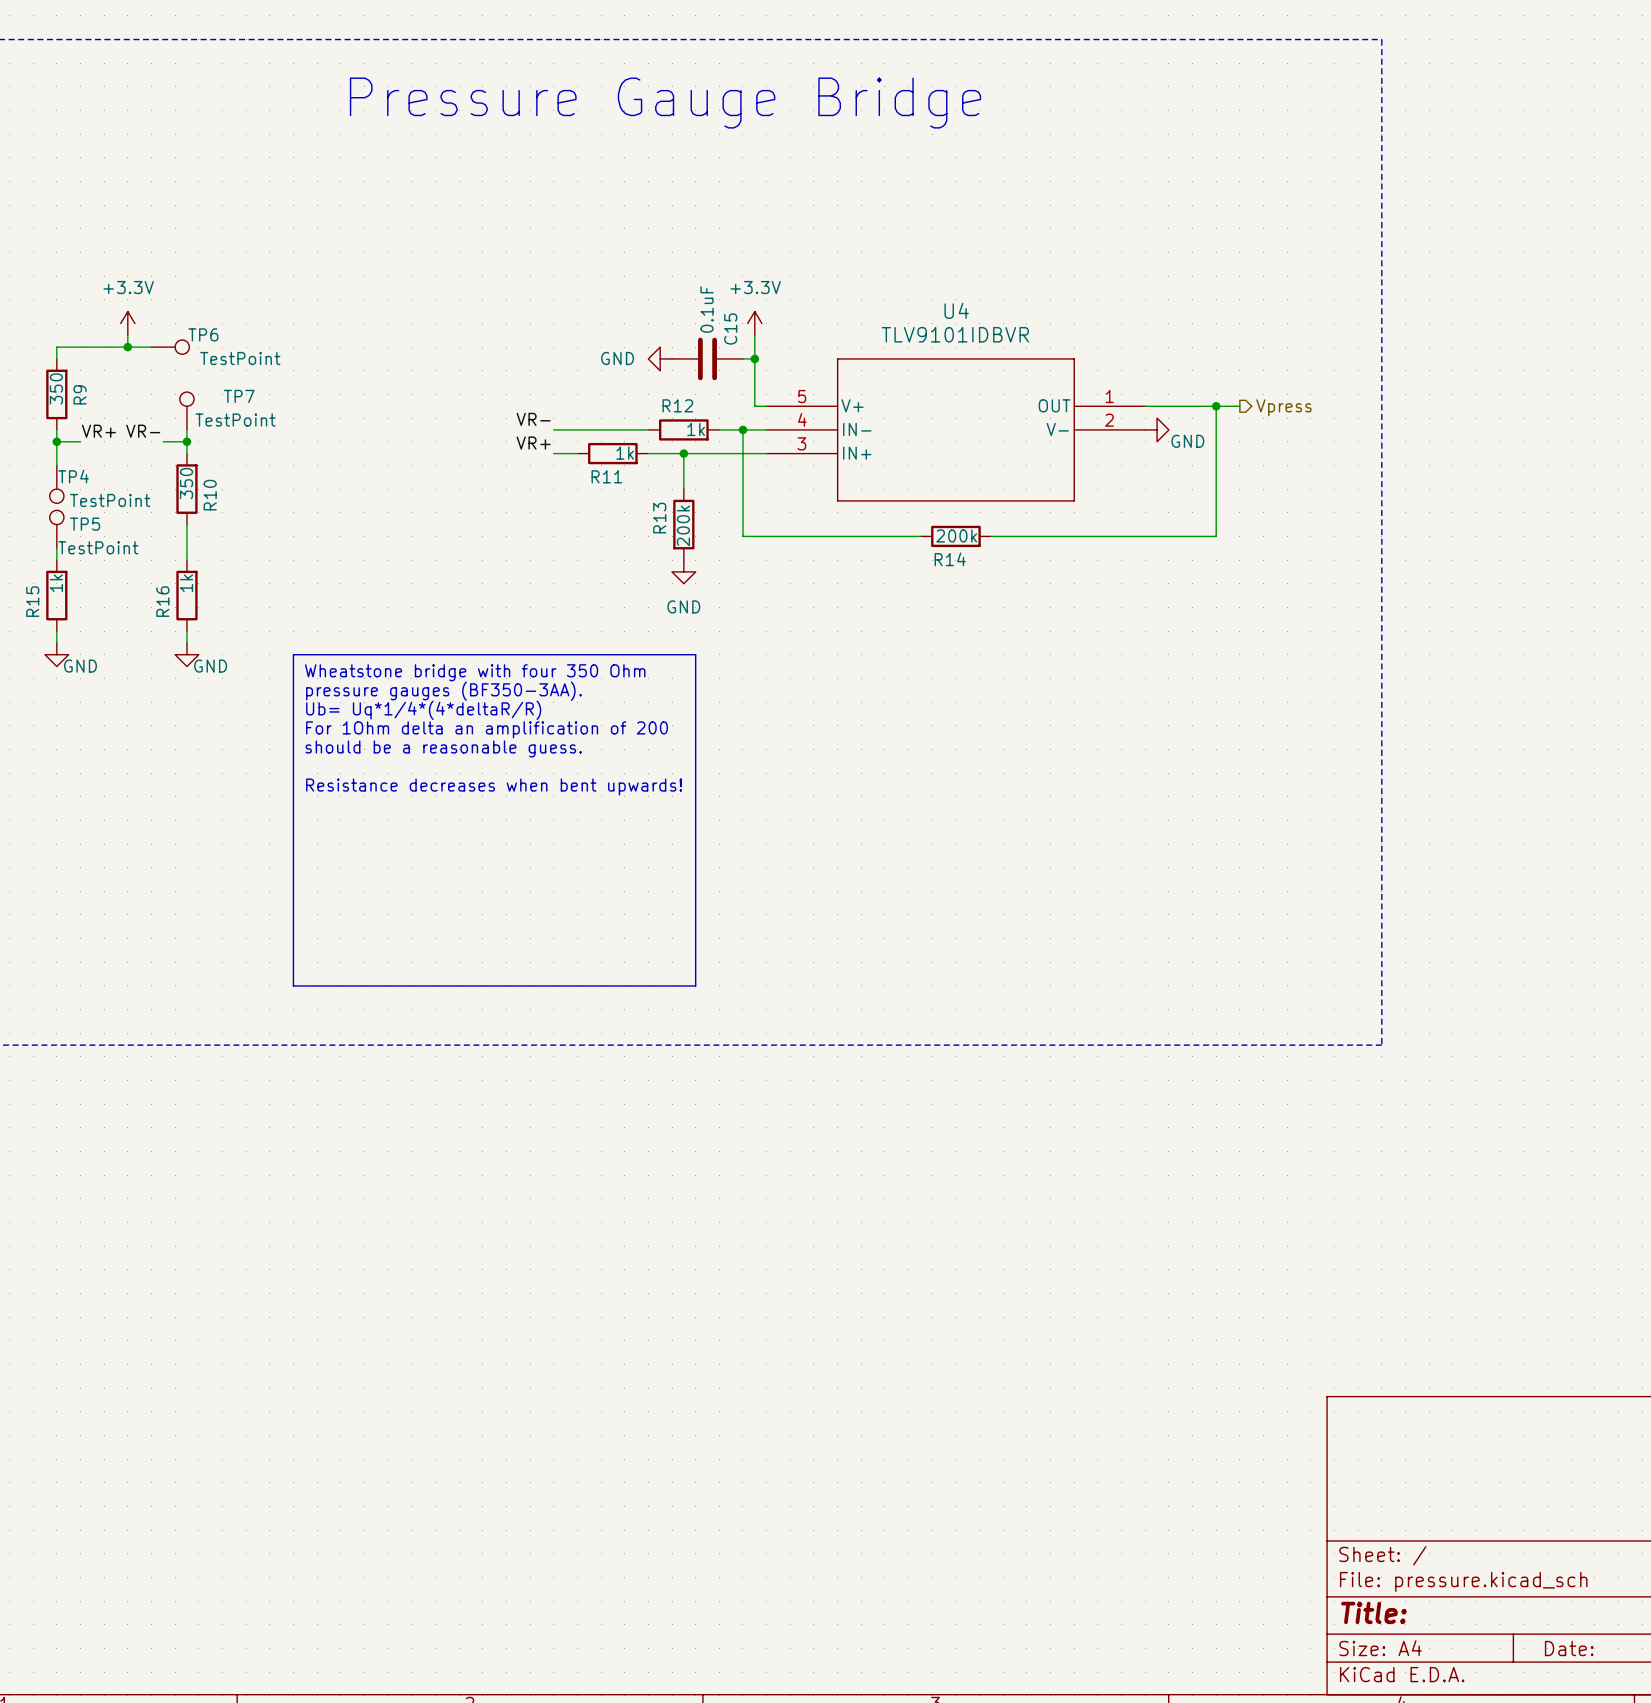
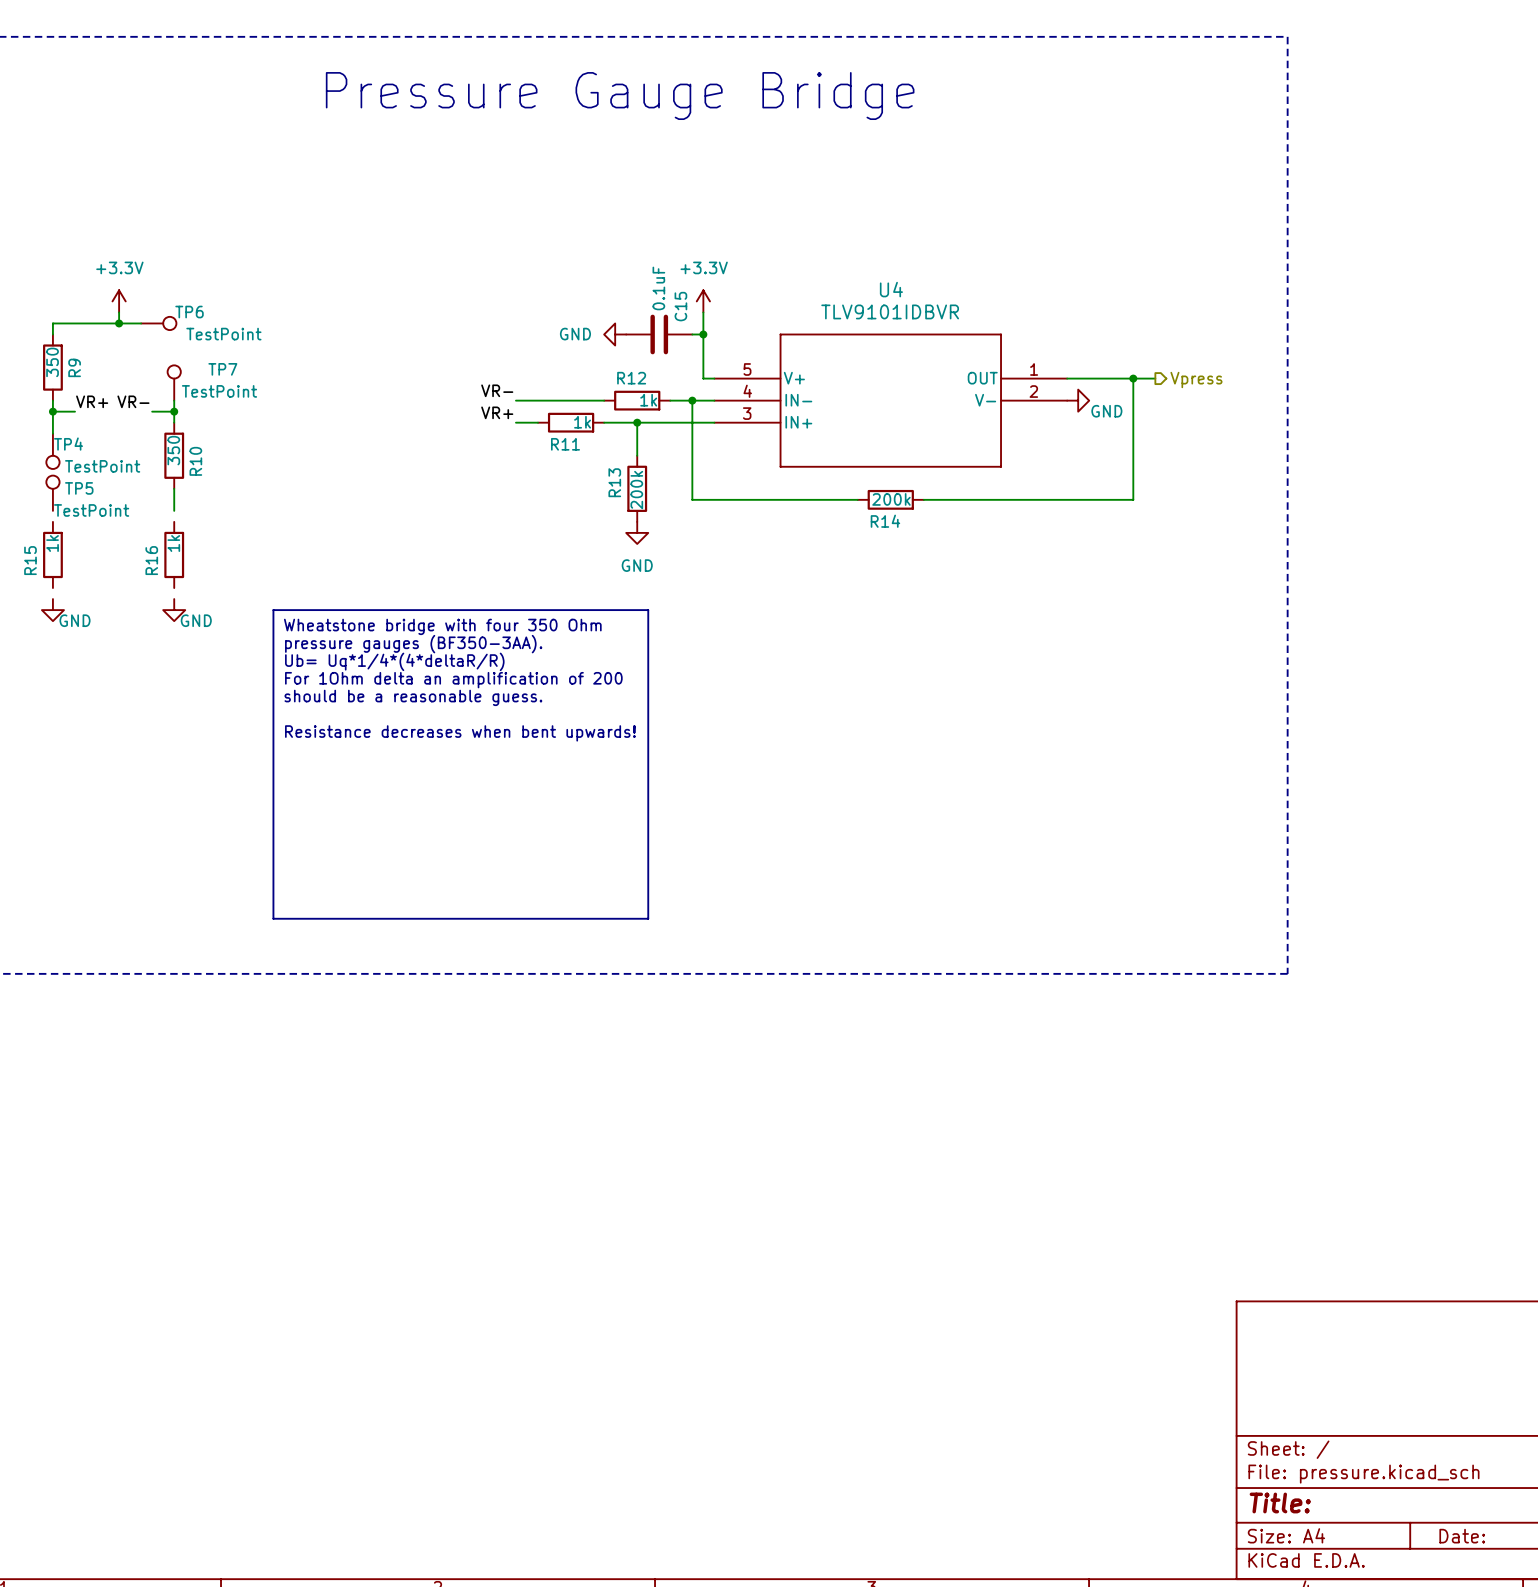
wire: (56, 548) (56, 560) -> none
wire: (186, 548) (186, 560) -> none
wire: (56, 631) (56, 642) -> none
wire: (186, 631) (186, 642) -> none

